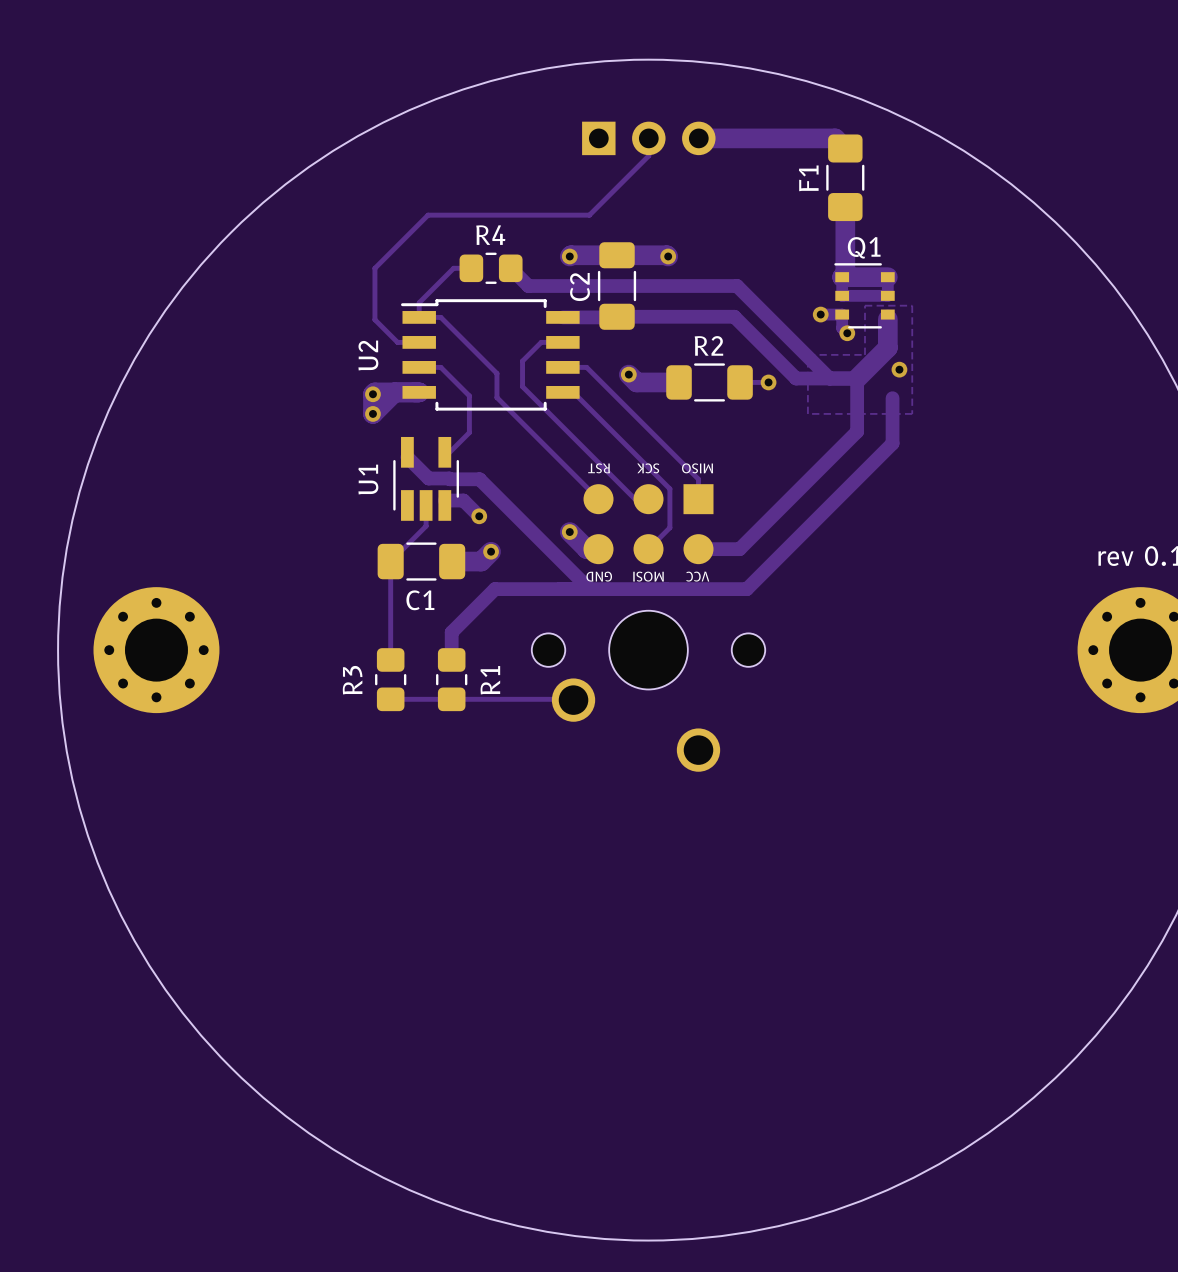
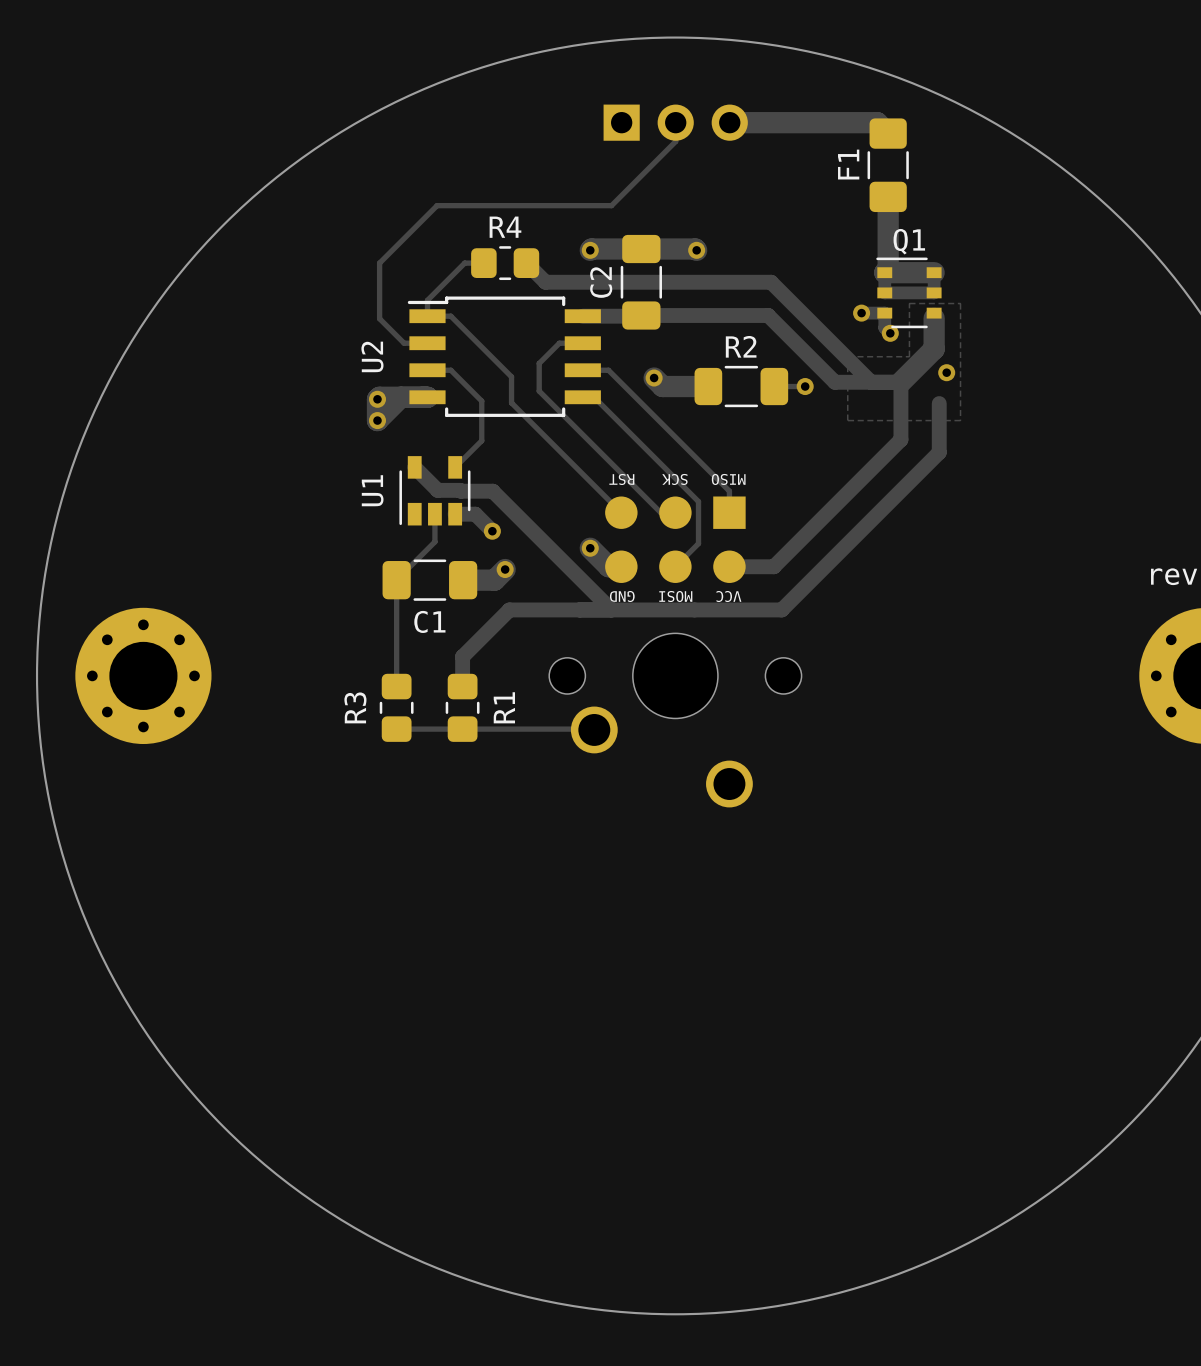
U1 footprint: [393, 436, 459, 521] -> [399, 456, 471, 526]

